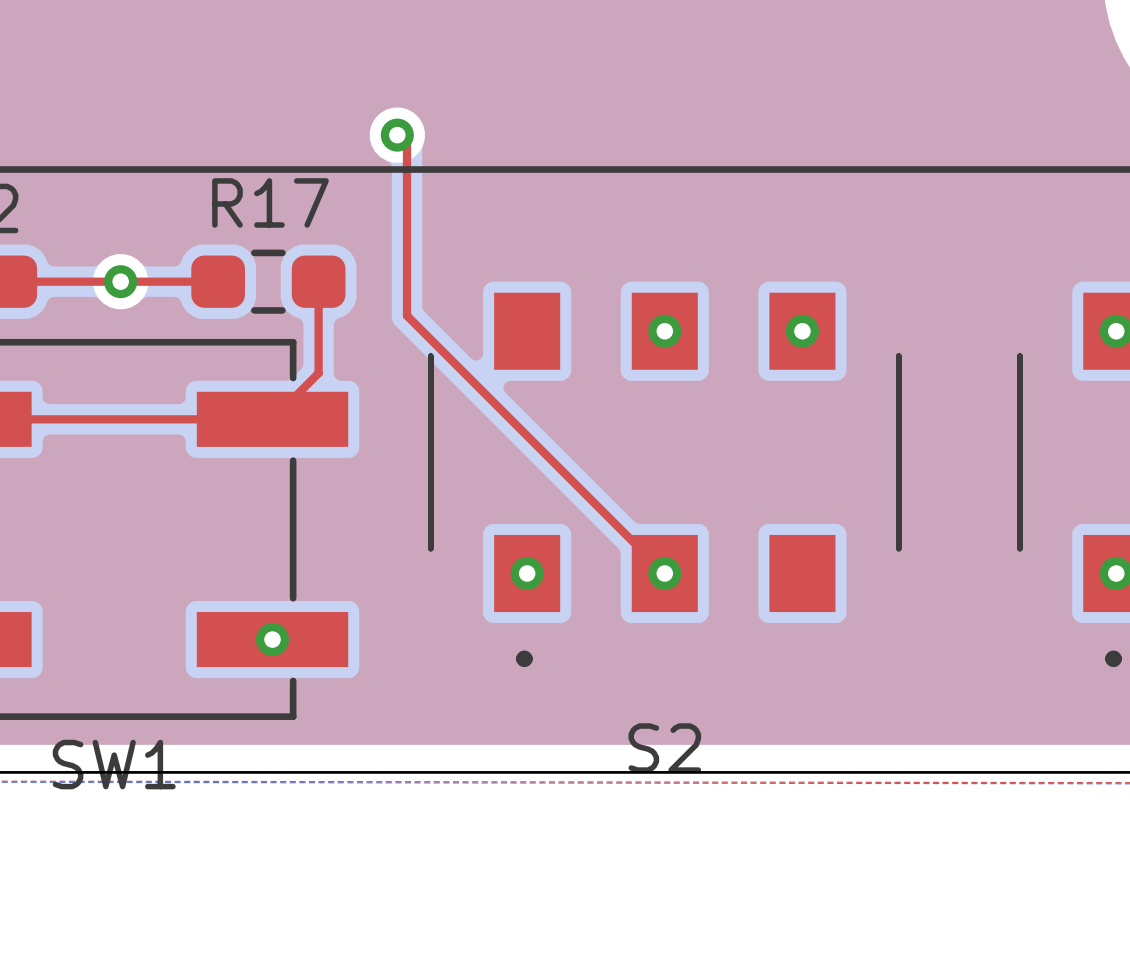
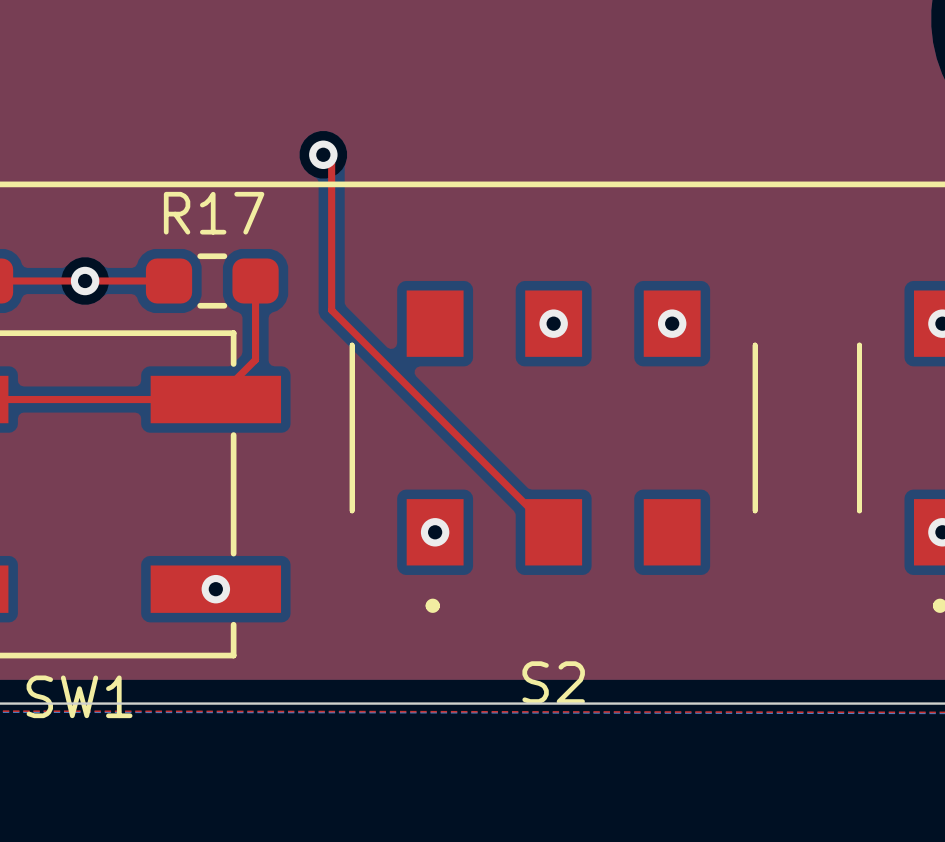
via: (664, 573) -> none

